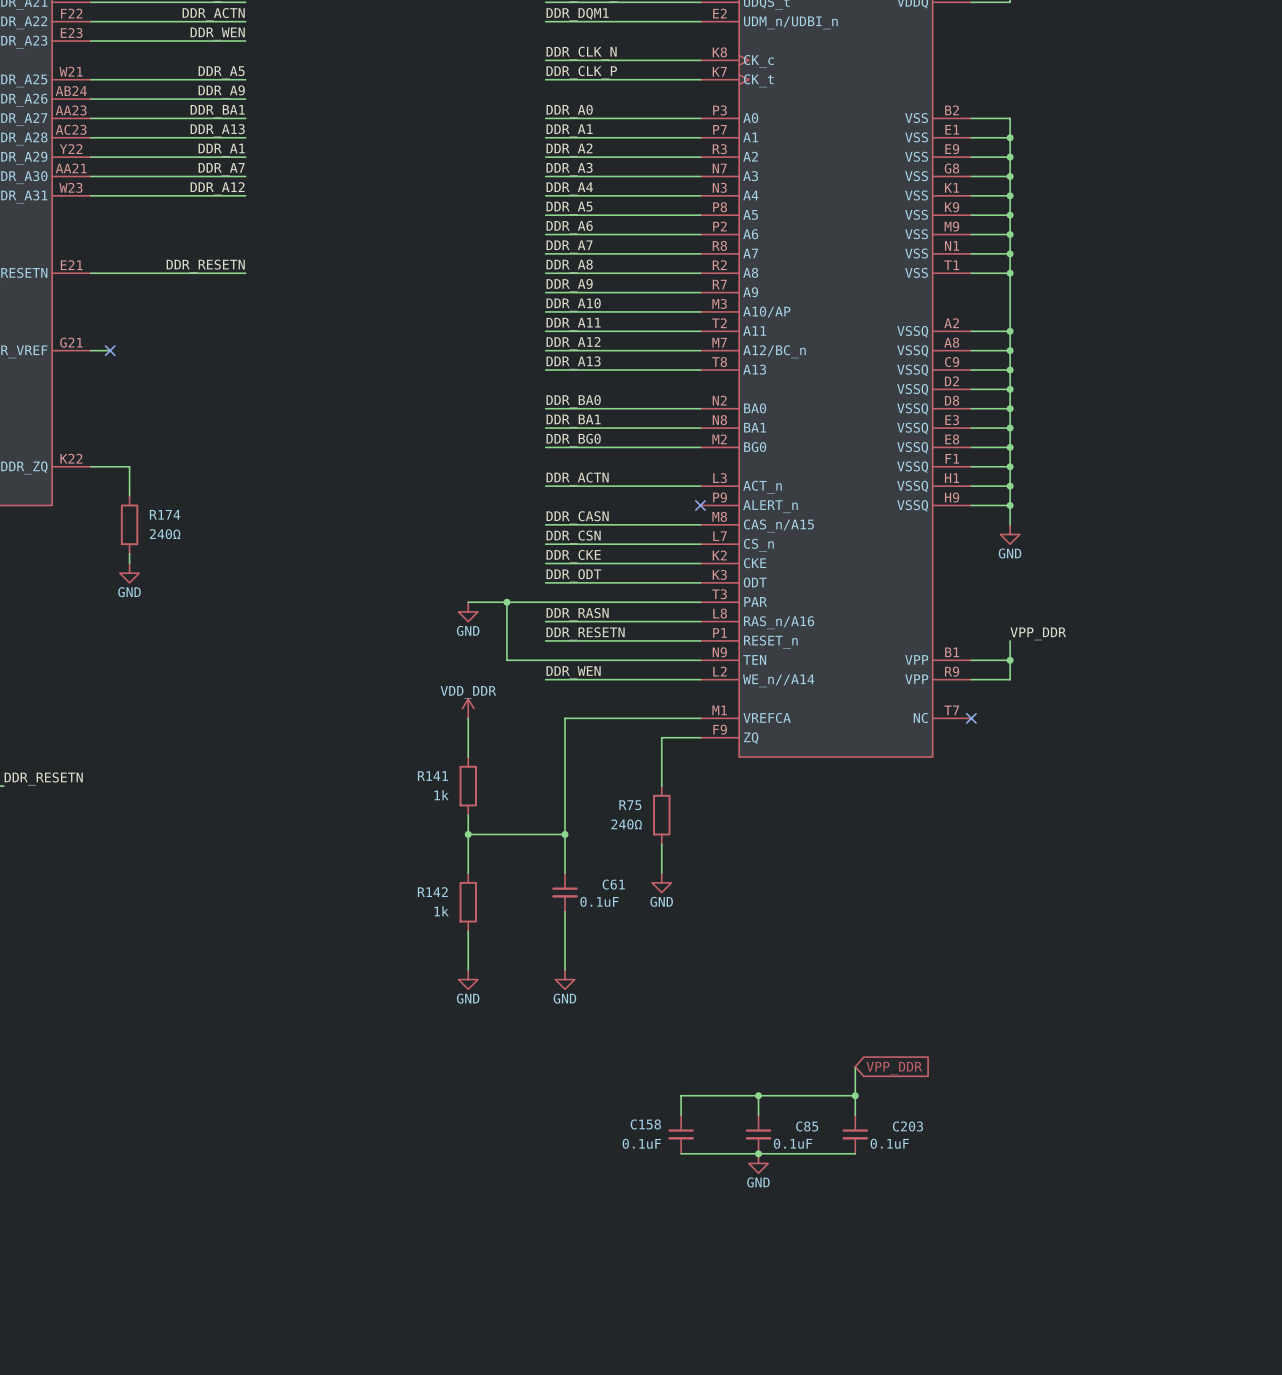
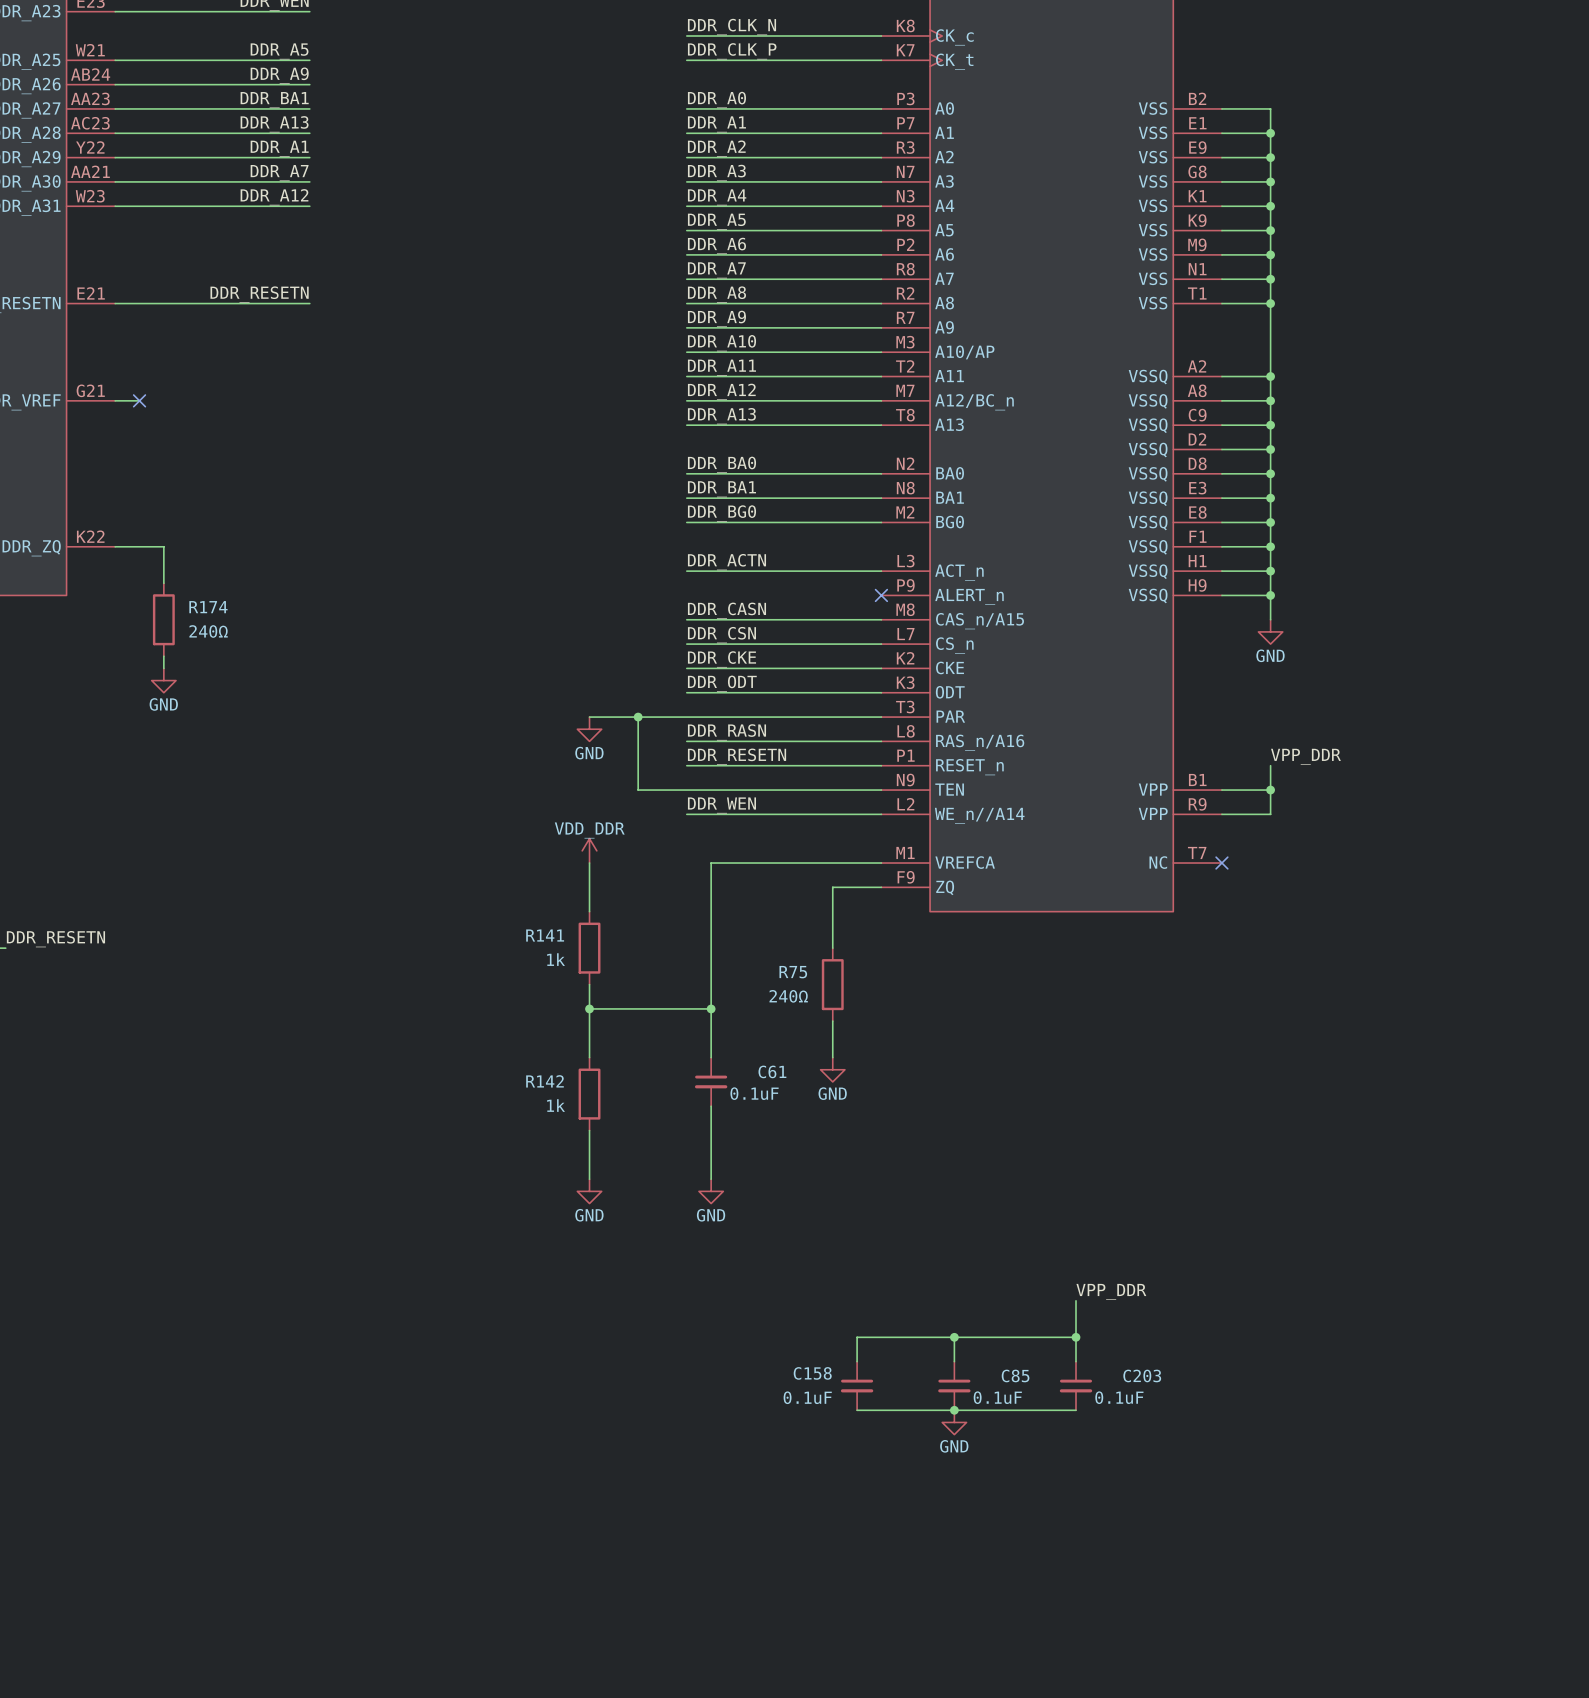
label: none -> VPP_DDR (1111, 1291)
global label: VPP_DDR (894, 1068) -> none

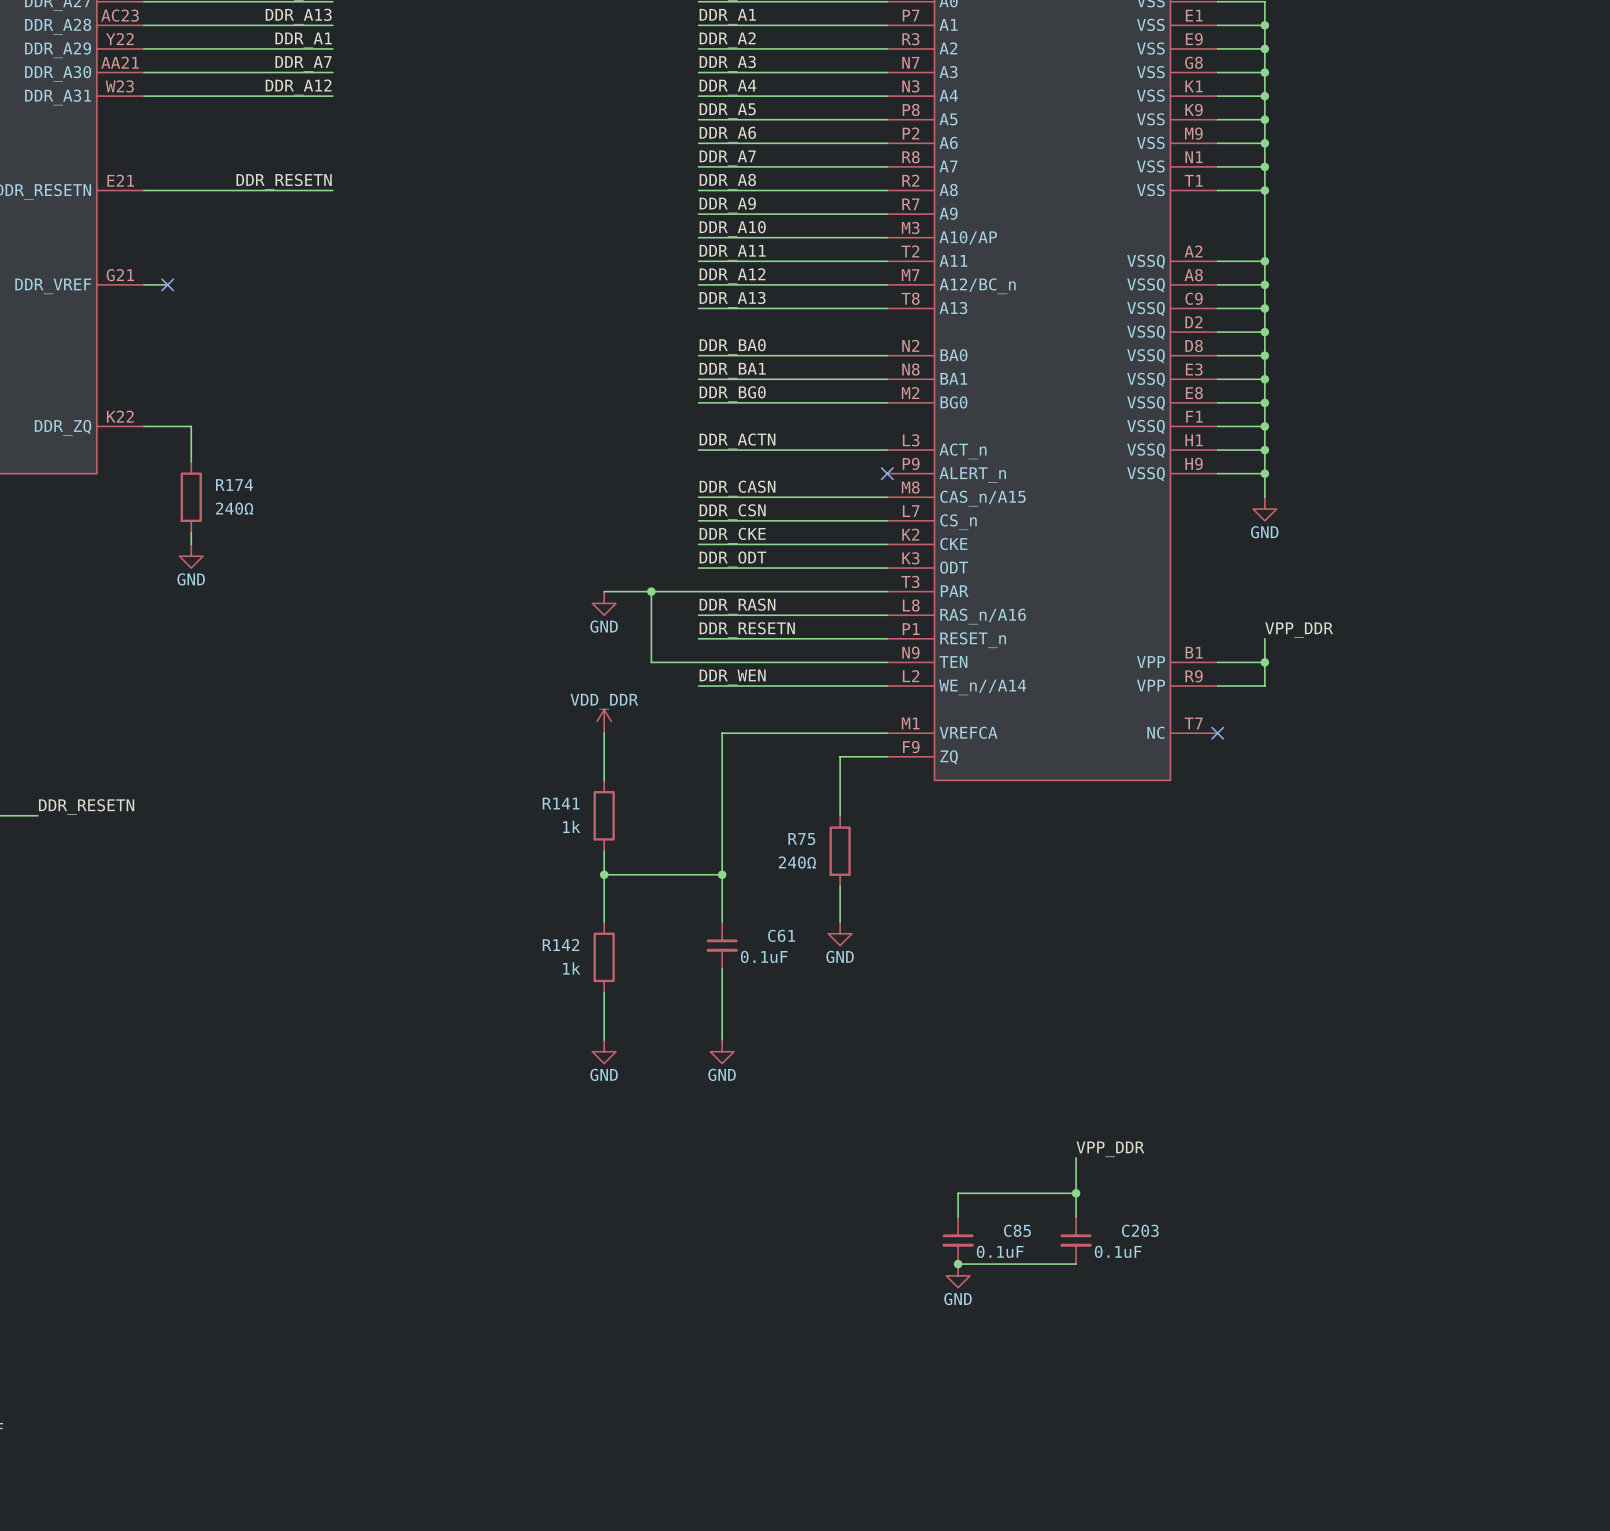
wire: (954, 1337) (857, 1337) (857, 1361) -> none
junction: (954, 1337) -> none
C158: (857, 1385) -> none
wire: (857, 1410) (954, 1410) -> none

